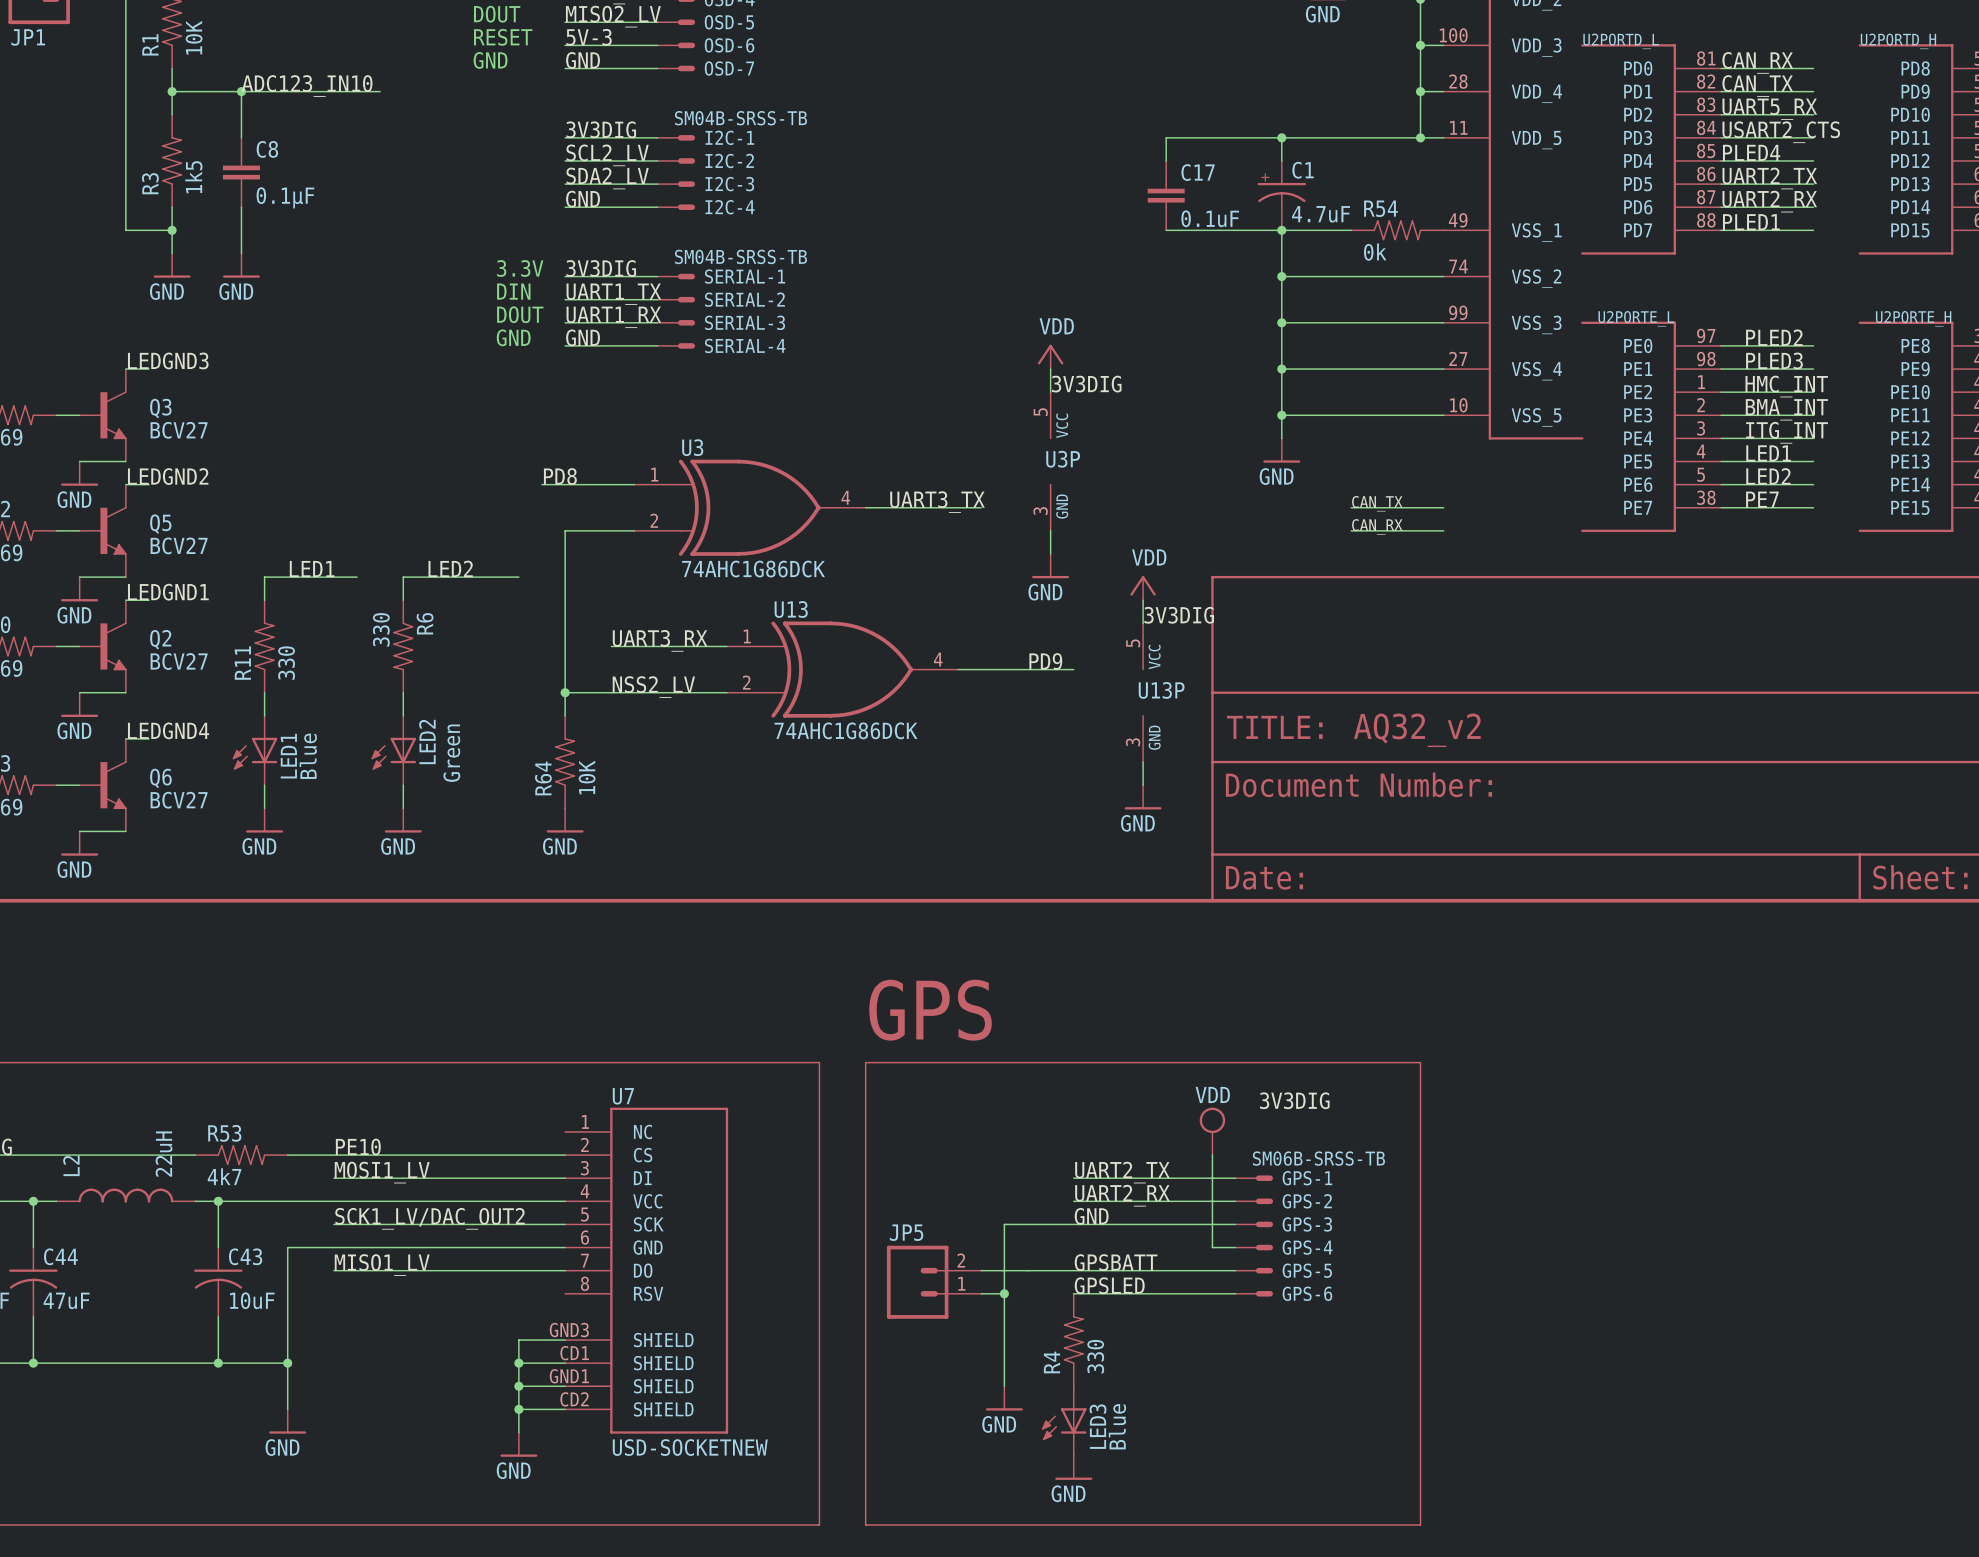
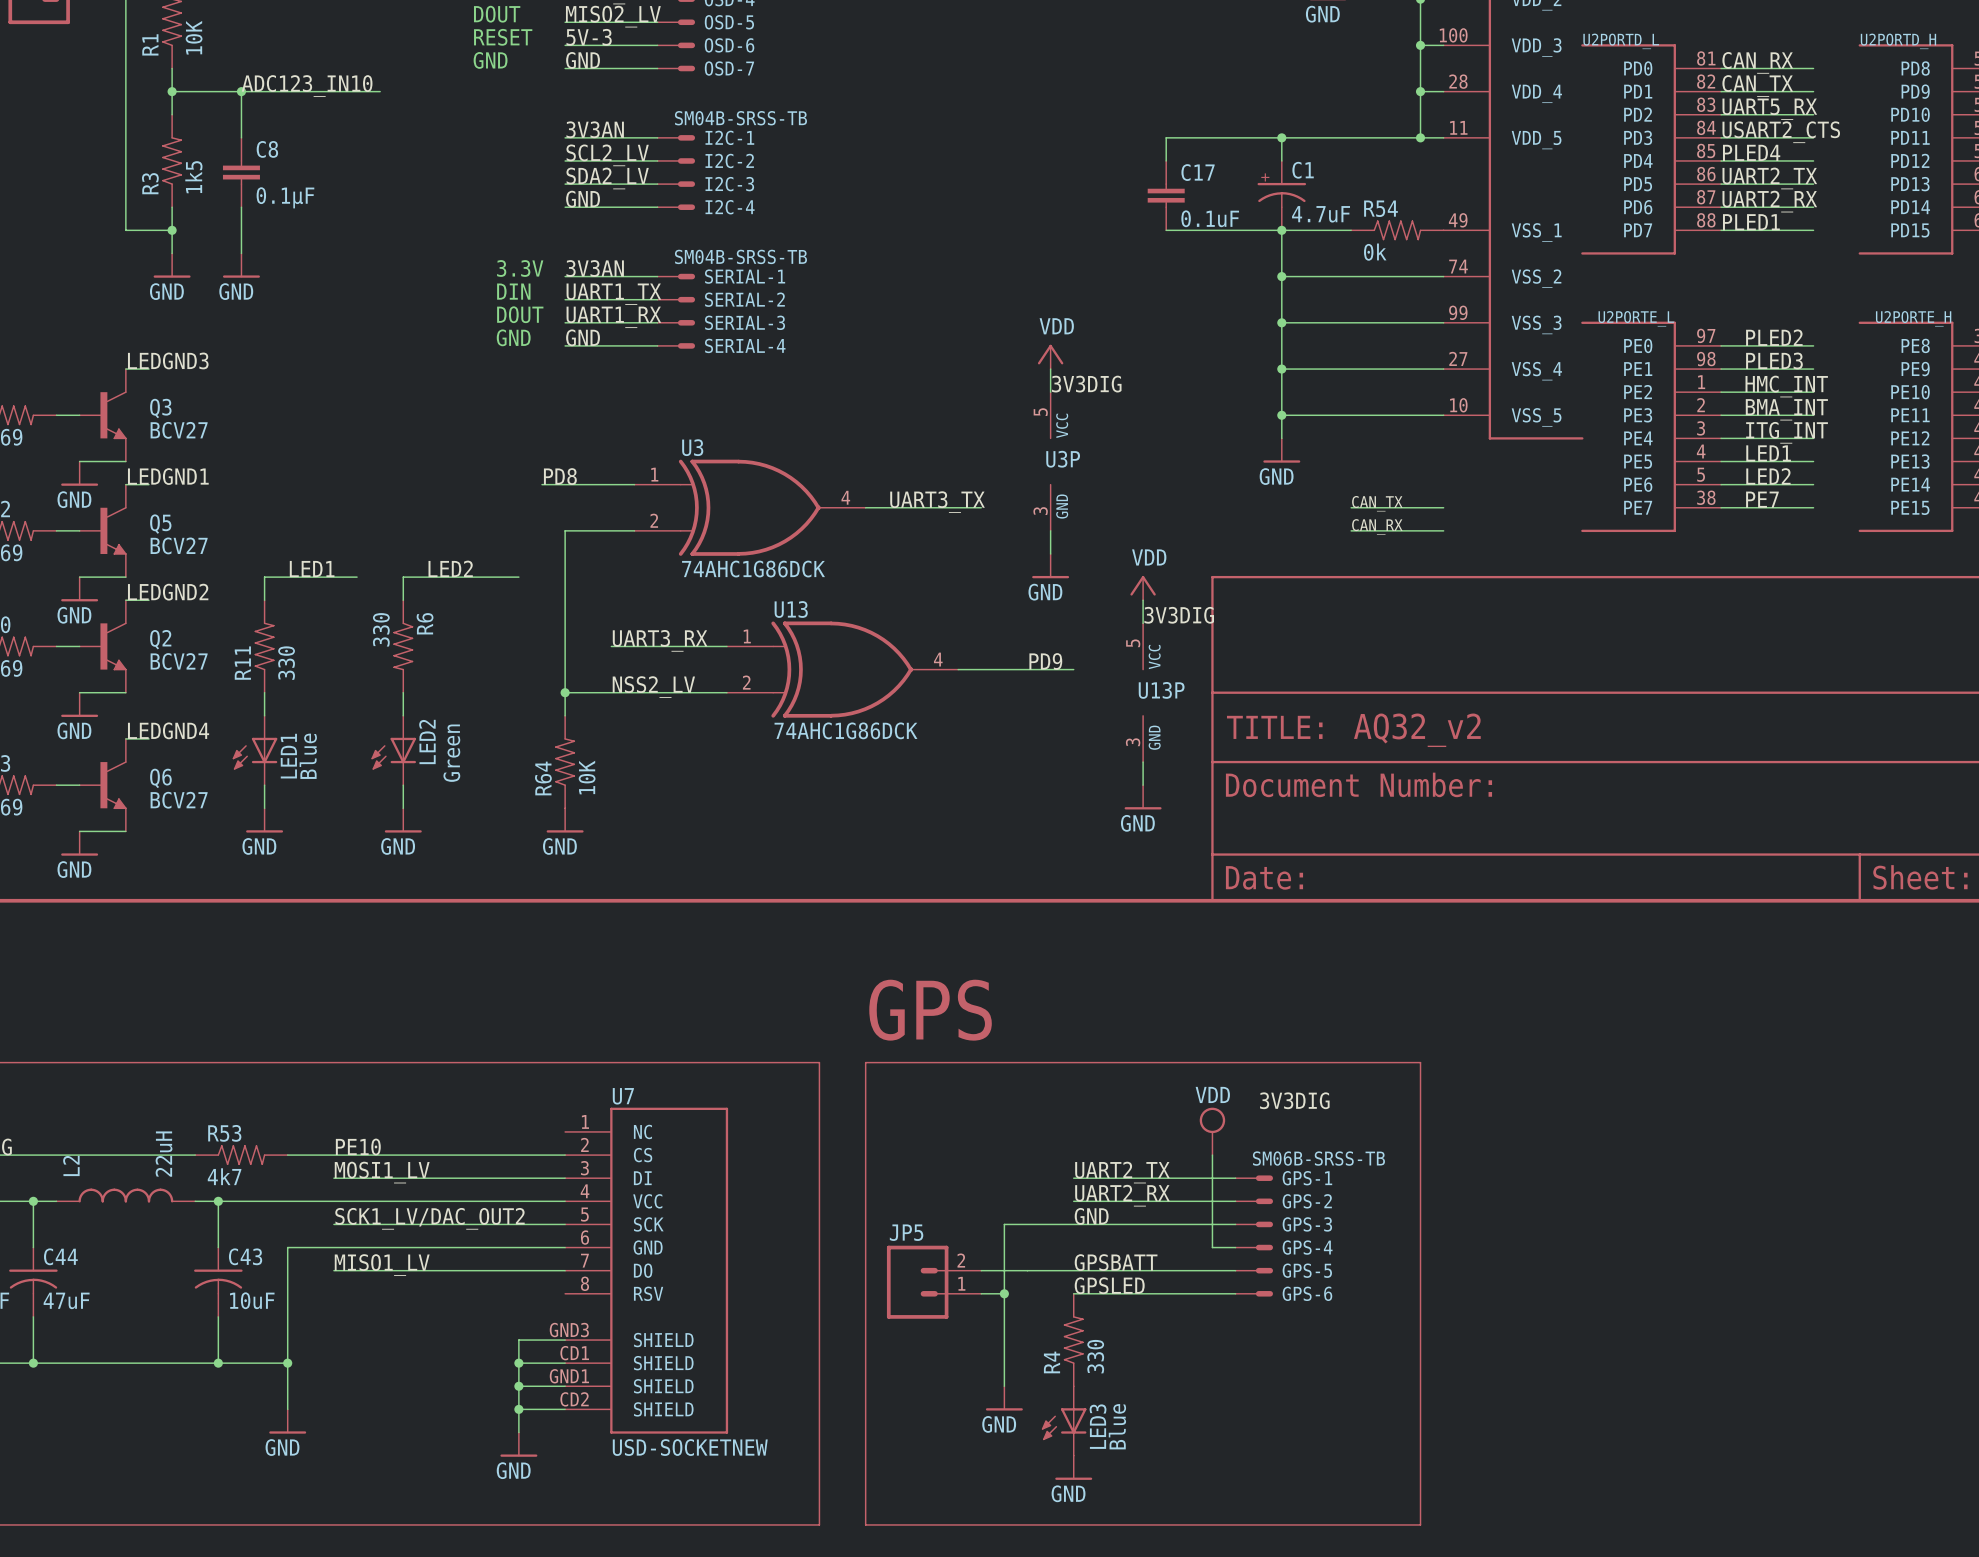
part value: JP1 (28, 37) -> none
label: 3V3DIG (601, 129) -> 3V3AN (595, 129)
label: 3V3DIG (601, 268) -> 3V3AN (595, 268)
label: LEDGND2 (168, 476) -> LEDGND1 (168, 476)
label: LEDGND1 (168, 592) -> LEDGND2 (168, 592)

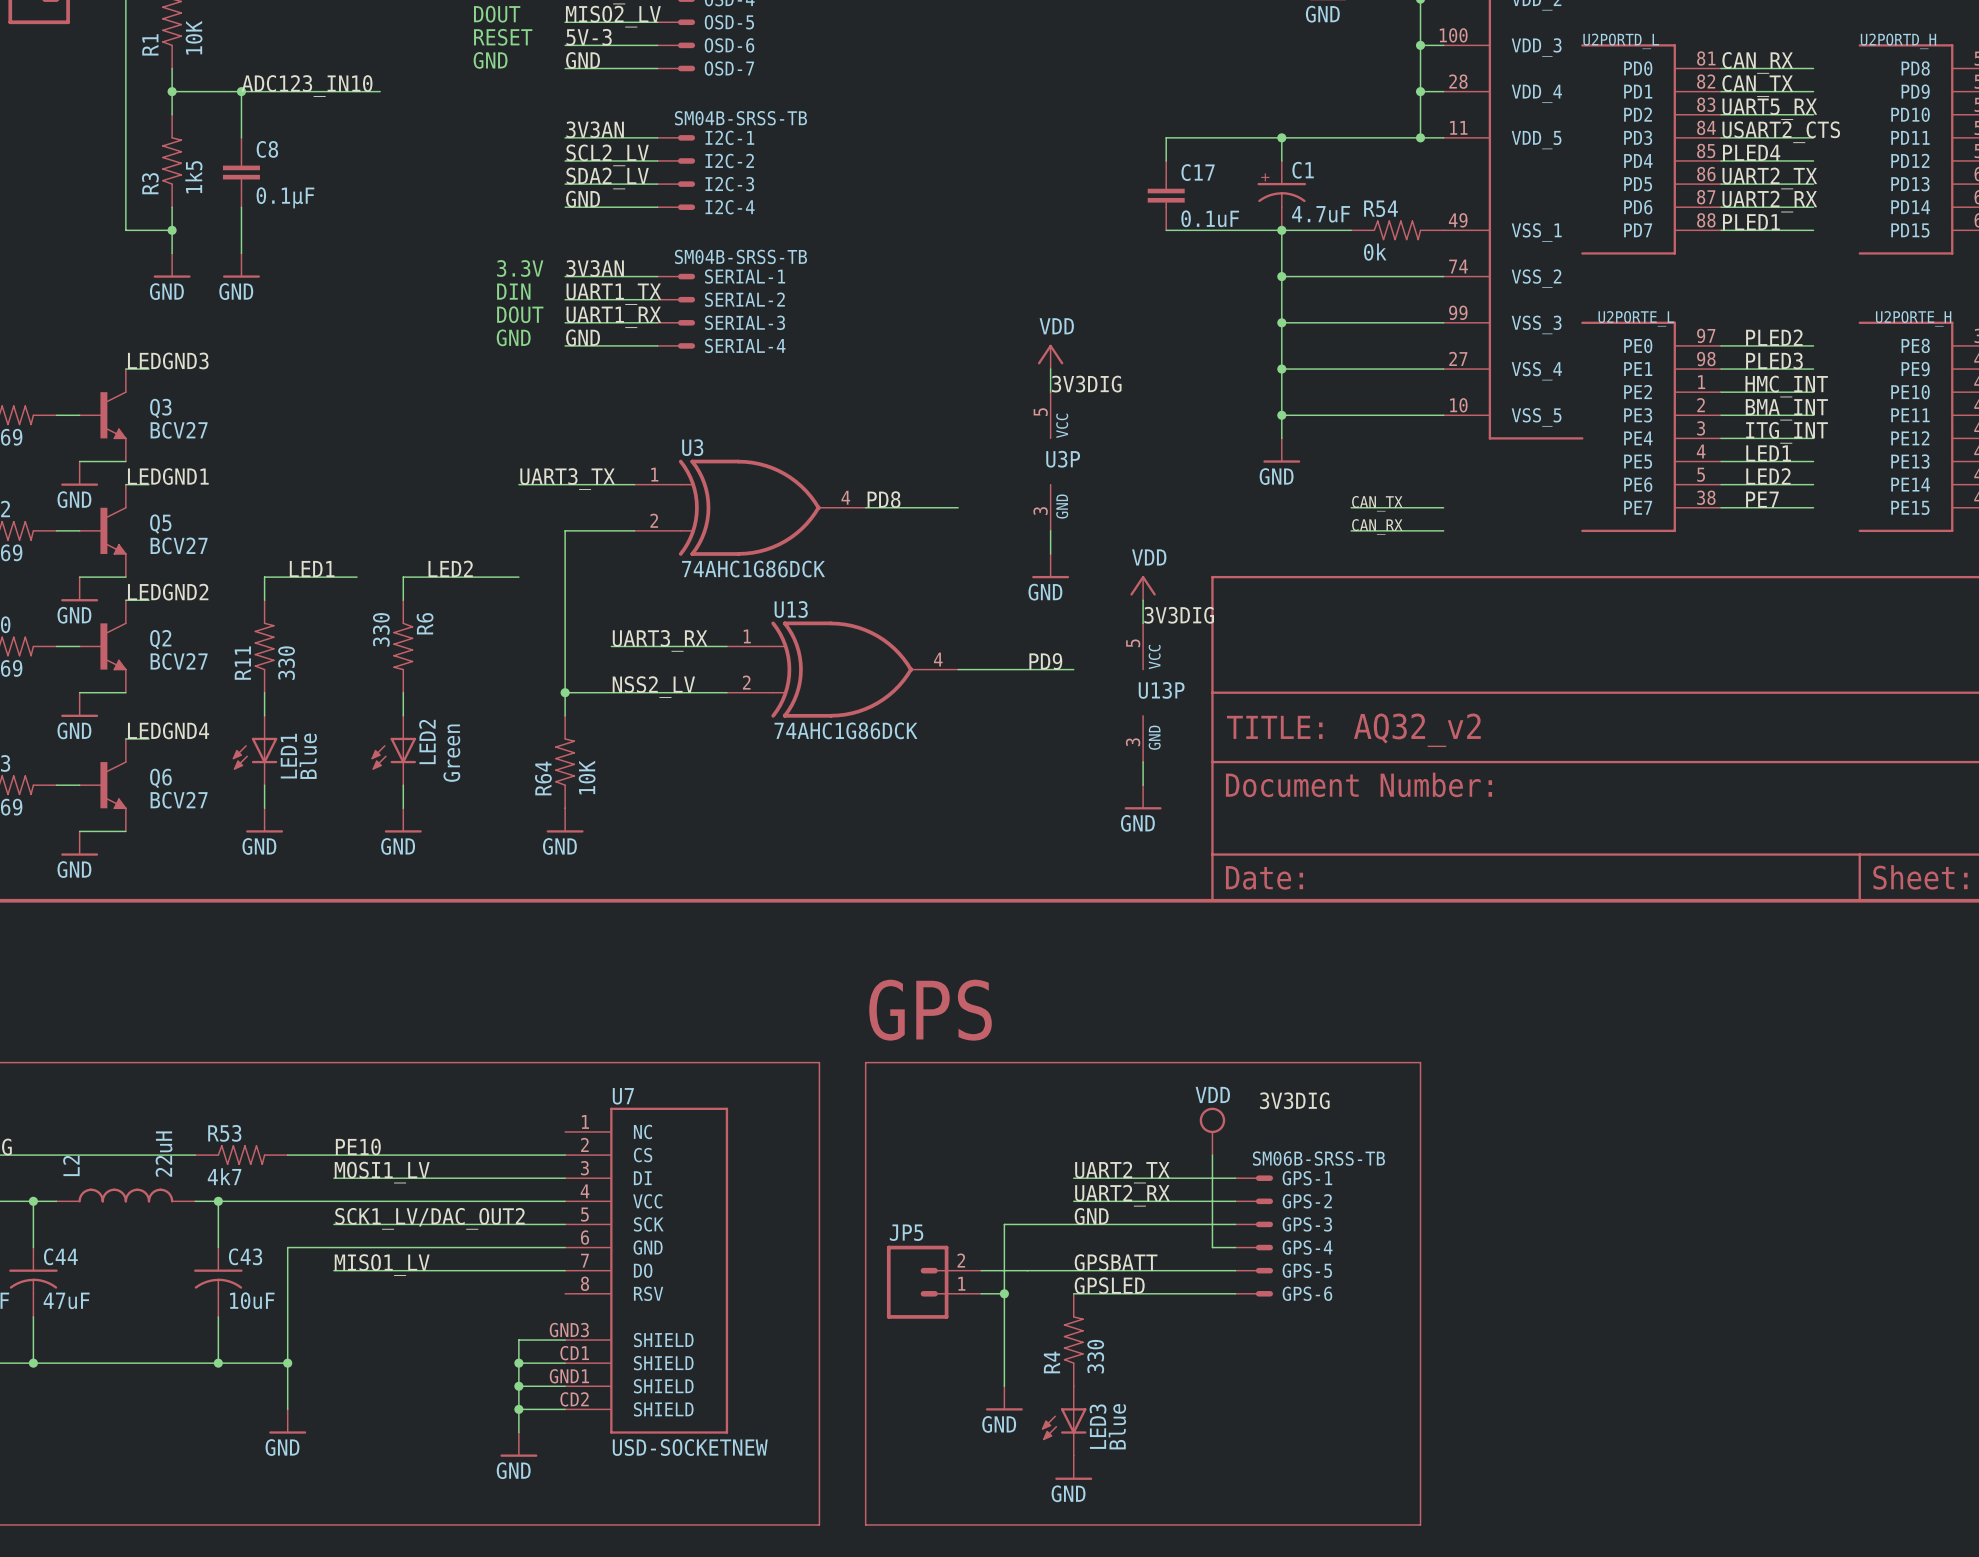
label: PD8 (560, 476) -> none
label: none -> UART3_TX (567, 479)
wire: none -> (518, 484) (542, 484)
label: none -> PD8 (884, 499)
label: UART3_TX (937, 502) -> none
wire: (958, 507) (981, 507) -> none

